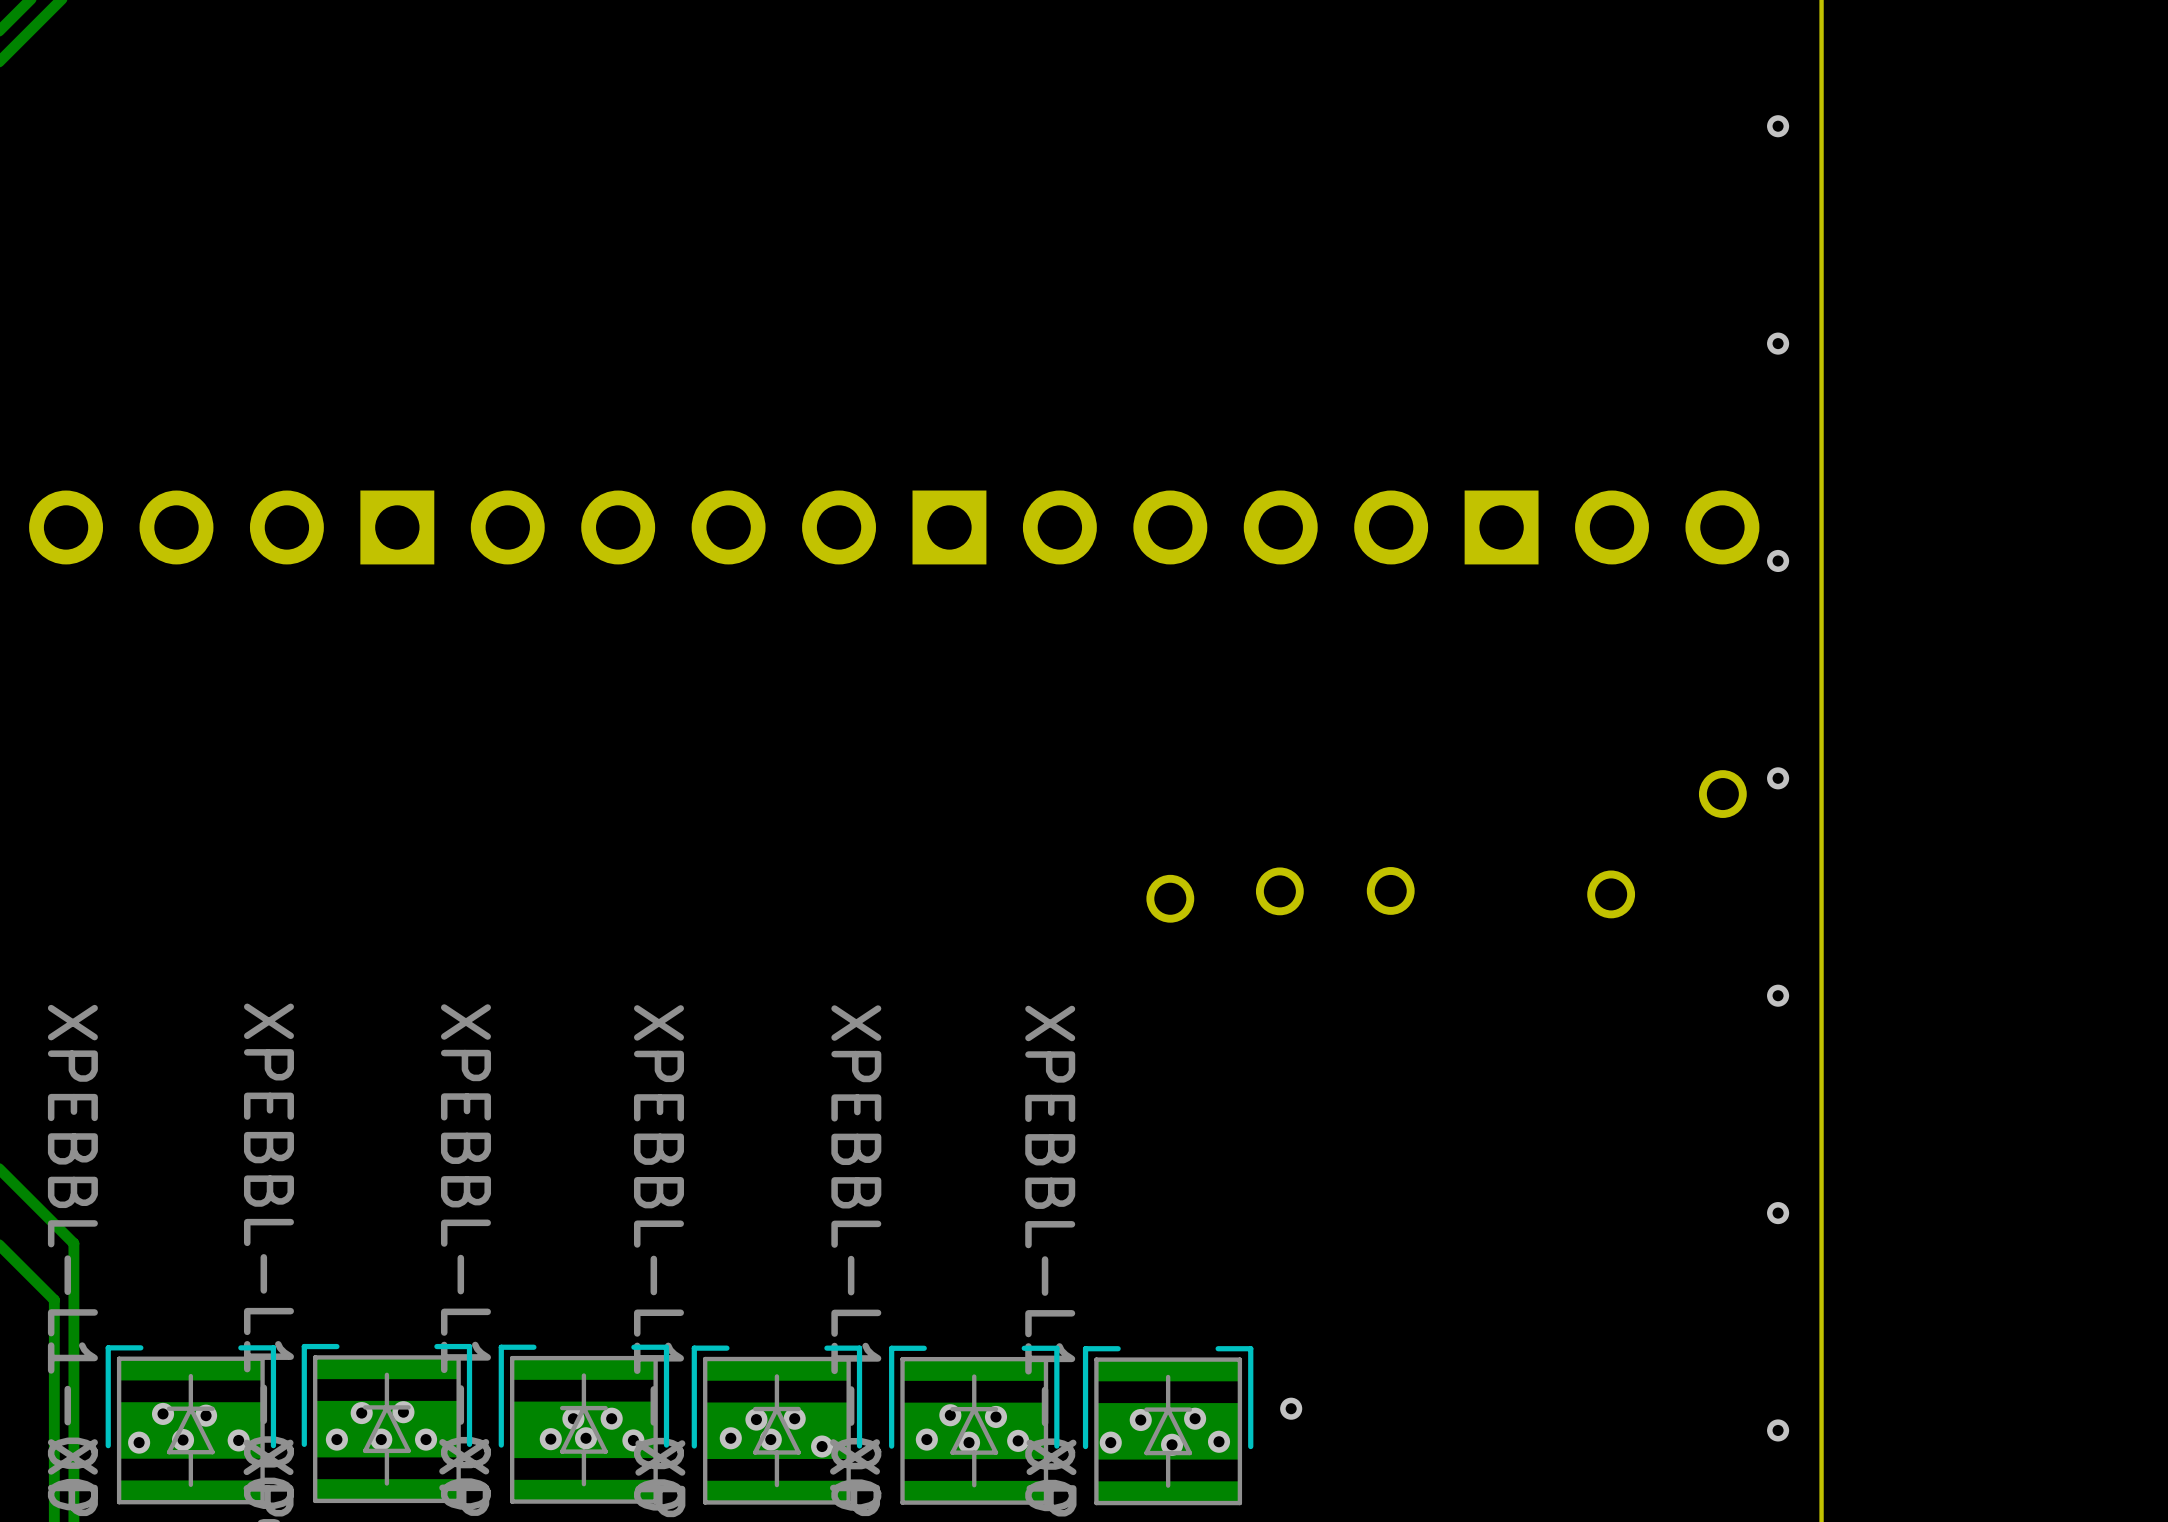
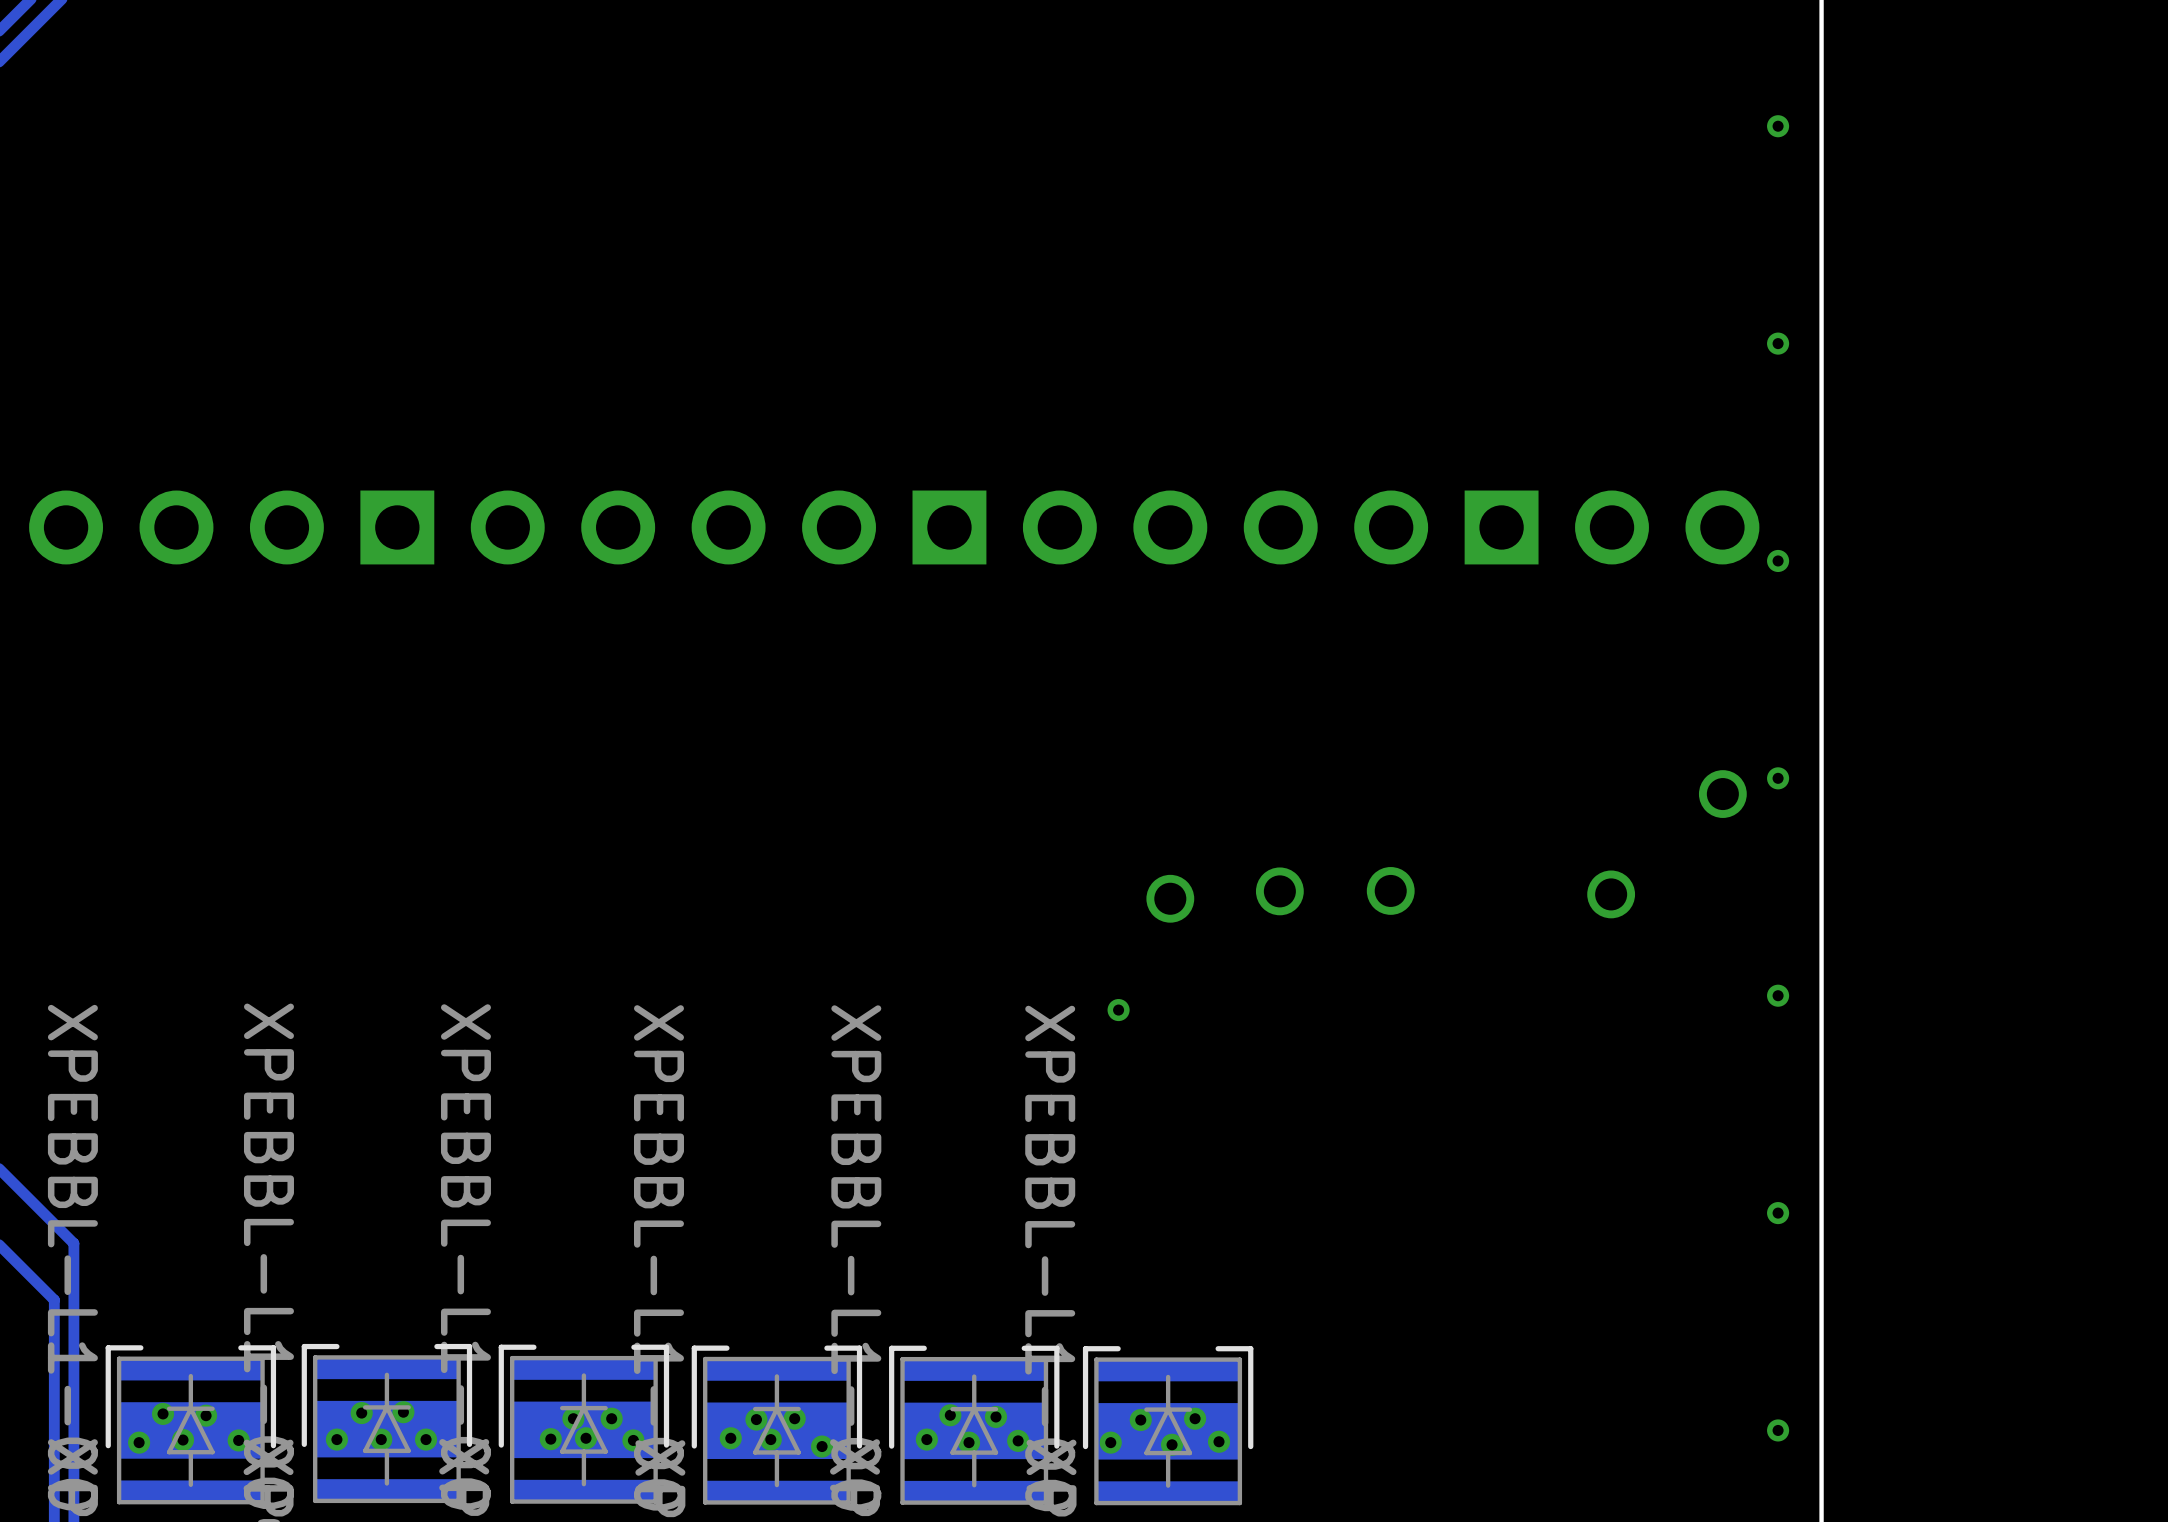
via: none -> (1118, 1010)
via: (1291, 1408) -> none

